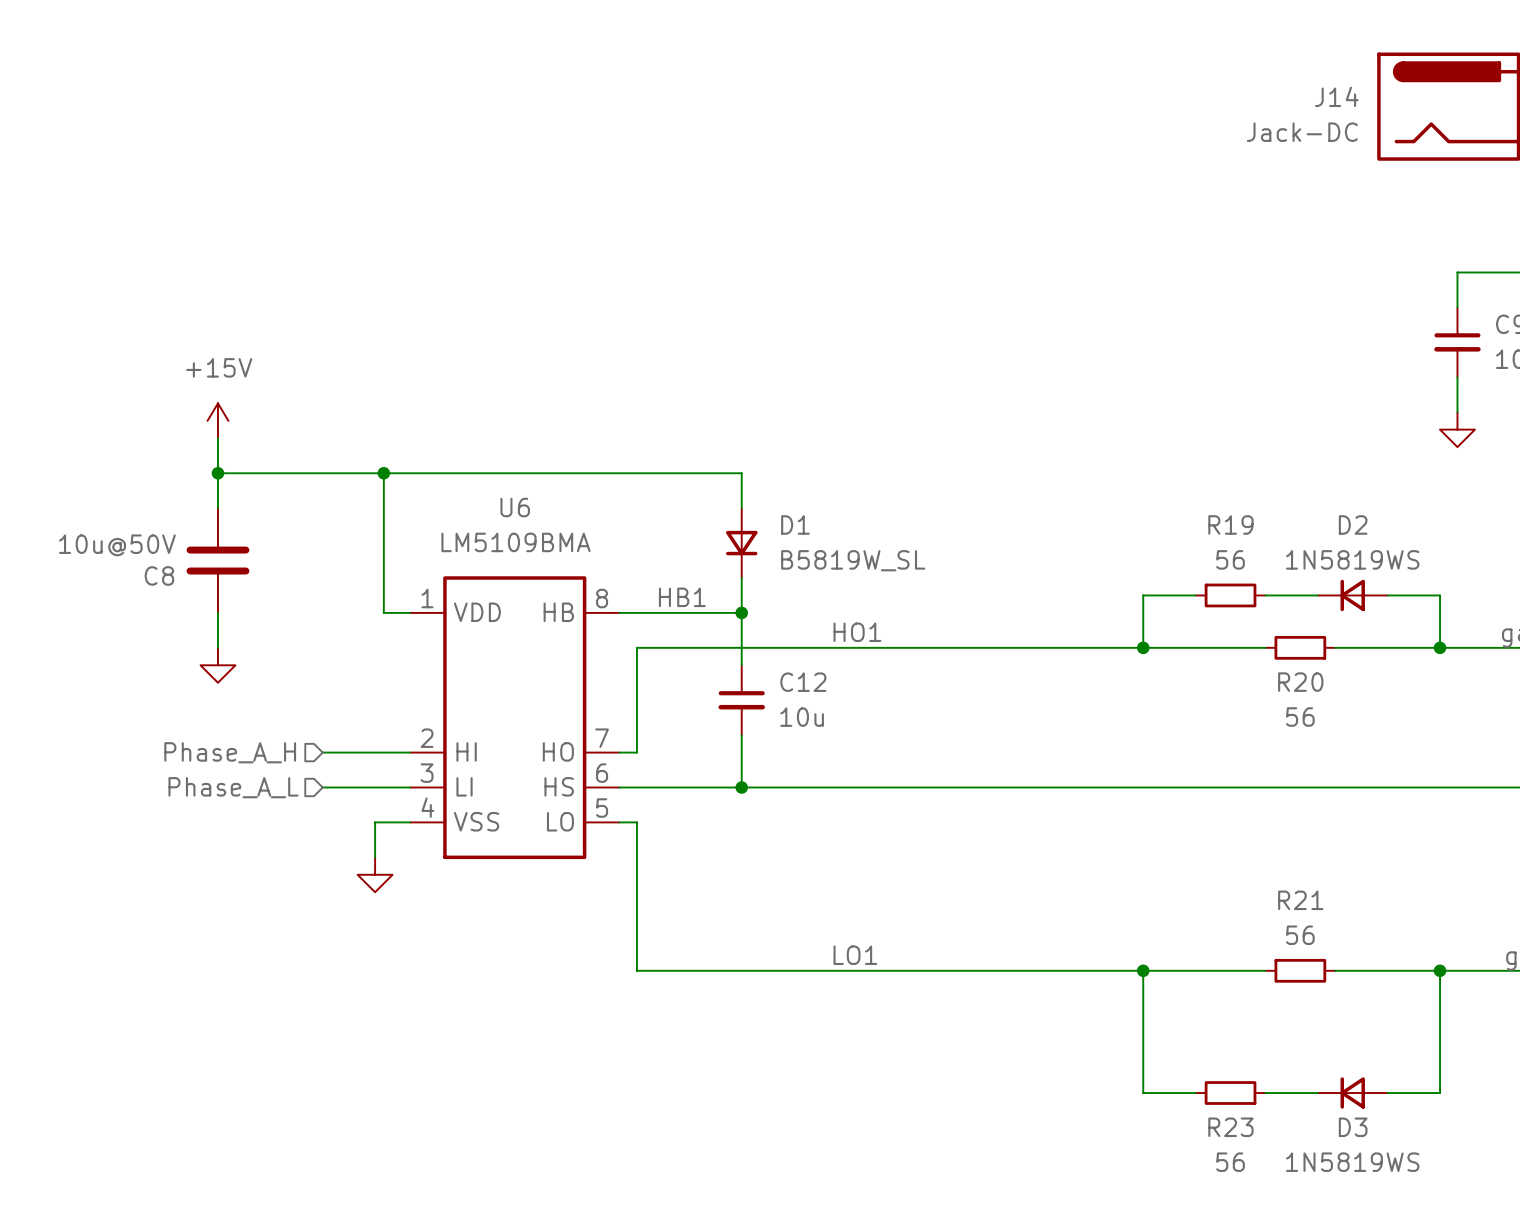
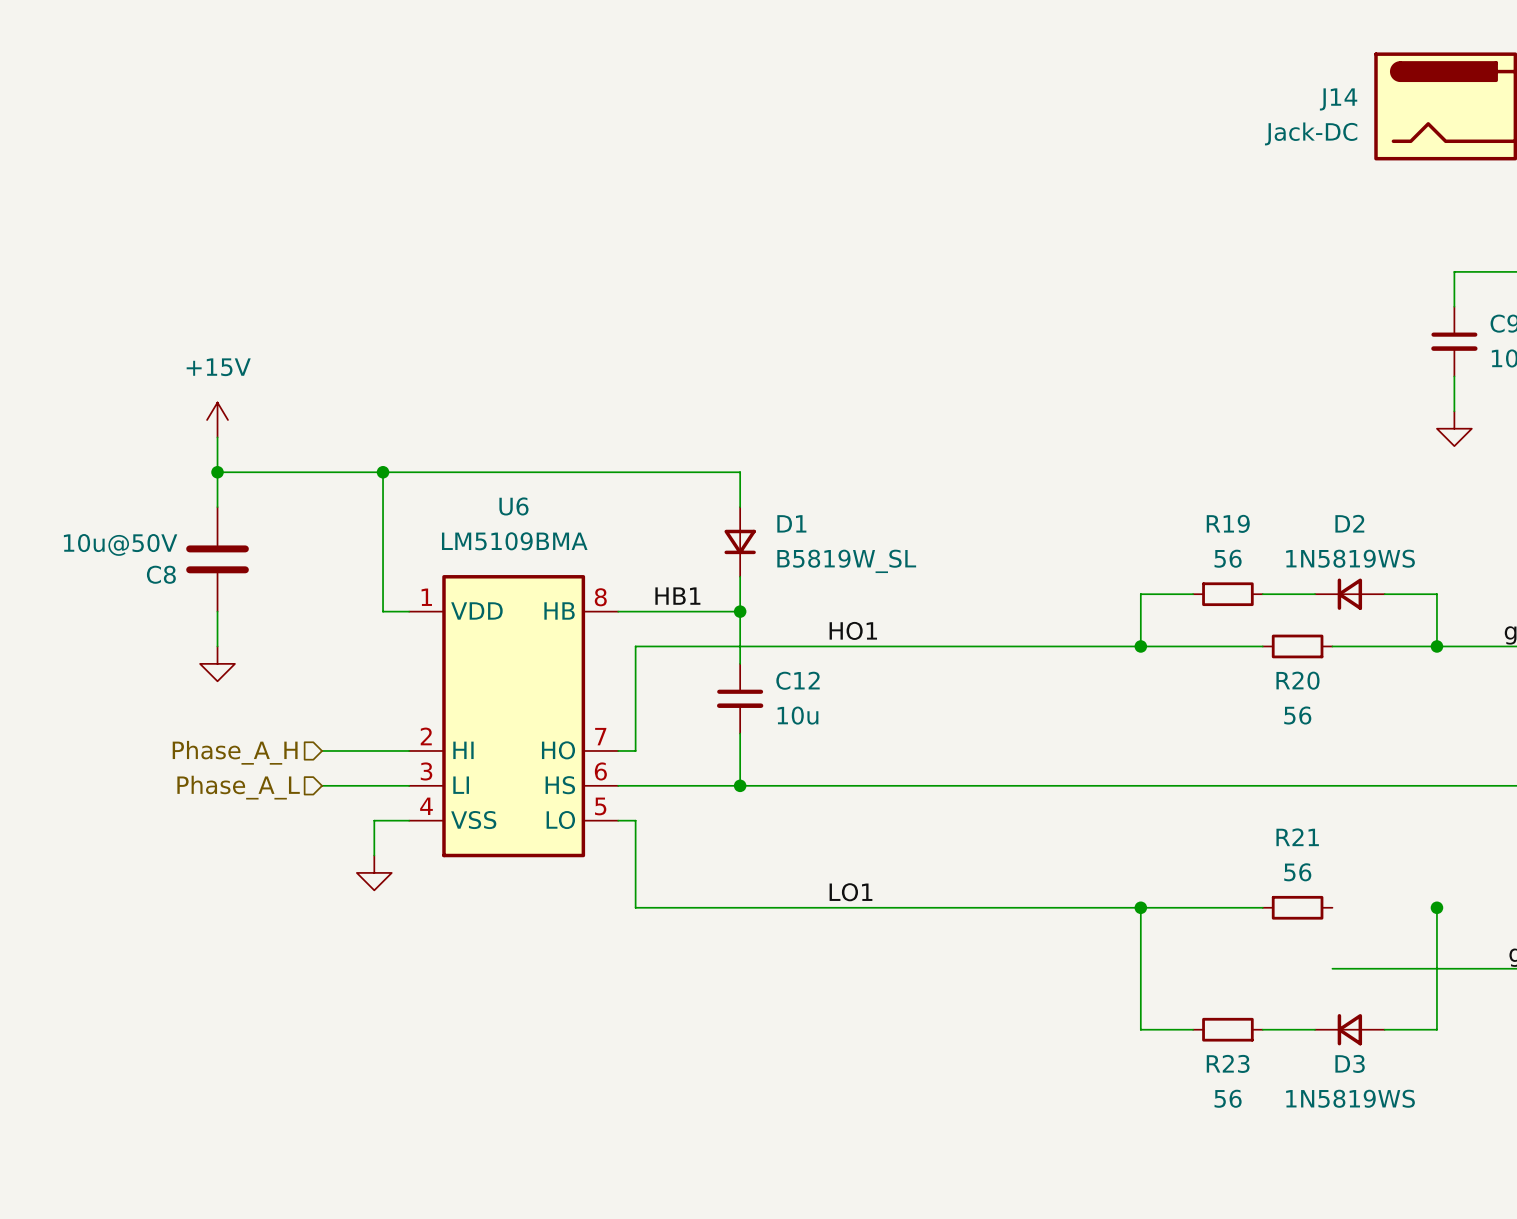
wire: (636, 909) (636, 970) (1265, 970) -> (635, 907) (1262, 907)
wire: none -> (1140, 907) (1140, 968)
wire: none -> (1436, 907) (1436, 968)
label position: LO1 (855, 955) -> LO1 (850, 892)
junction position: (1143, 970) -> (1140, 907)
R21 position: (1300, 970) -> (1297, 907)
junction position: (1440, 970) -> (1436, 907)
wire: (1143, 1031) (1143, 1093) (1195, 1093) -> (1140, 1029) (1193, 1029)
wire: (1440, 1031) (1440, 1093) (1387, 1093) -> (1436, 1029) (1384, 1029)
R23 position: (1230, 1093) -> (1227, 1029)
wire: (1265, 1093) (1317, 1093) -> (1262, 1029) (1315, 1029)
D3 position: (1352, 1093) -> (1349, 1029)

